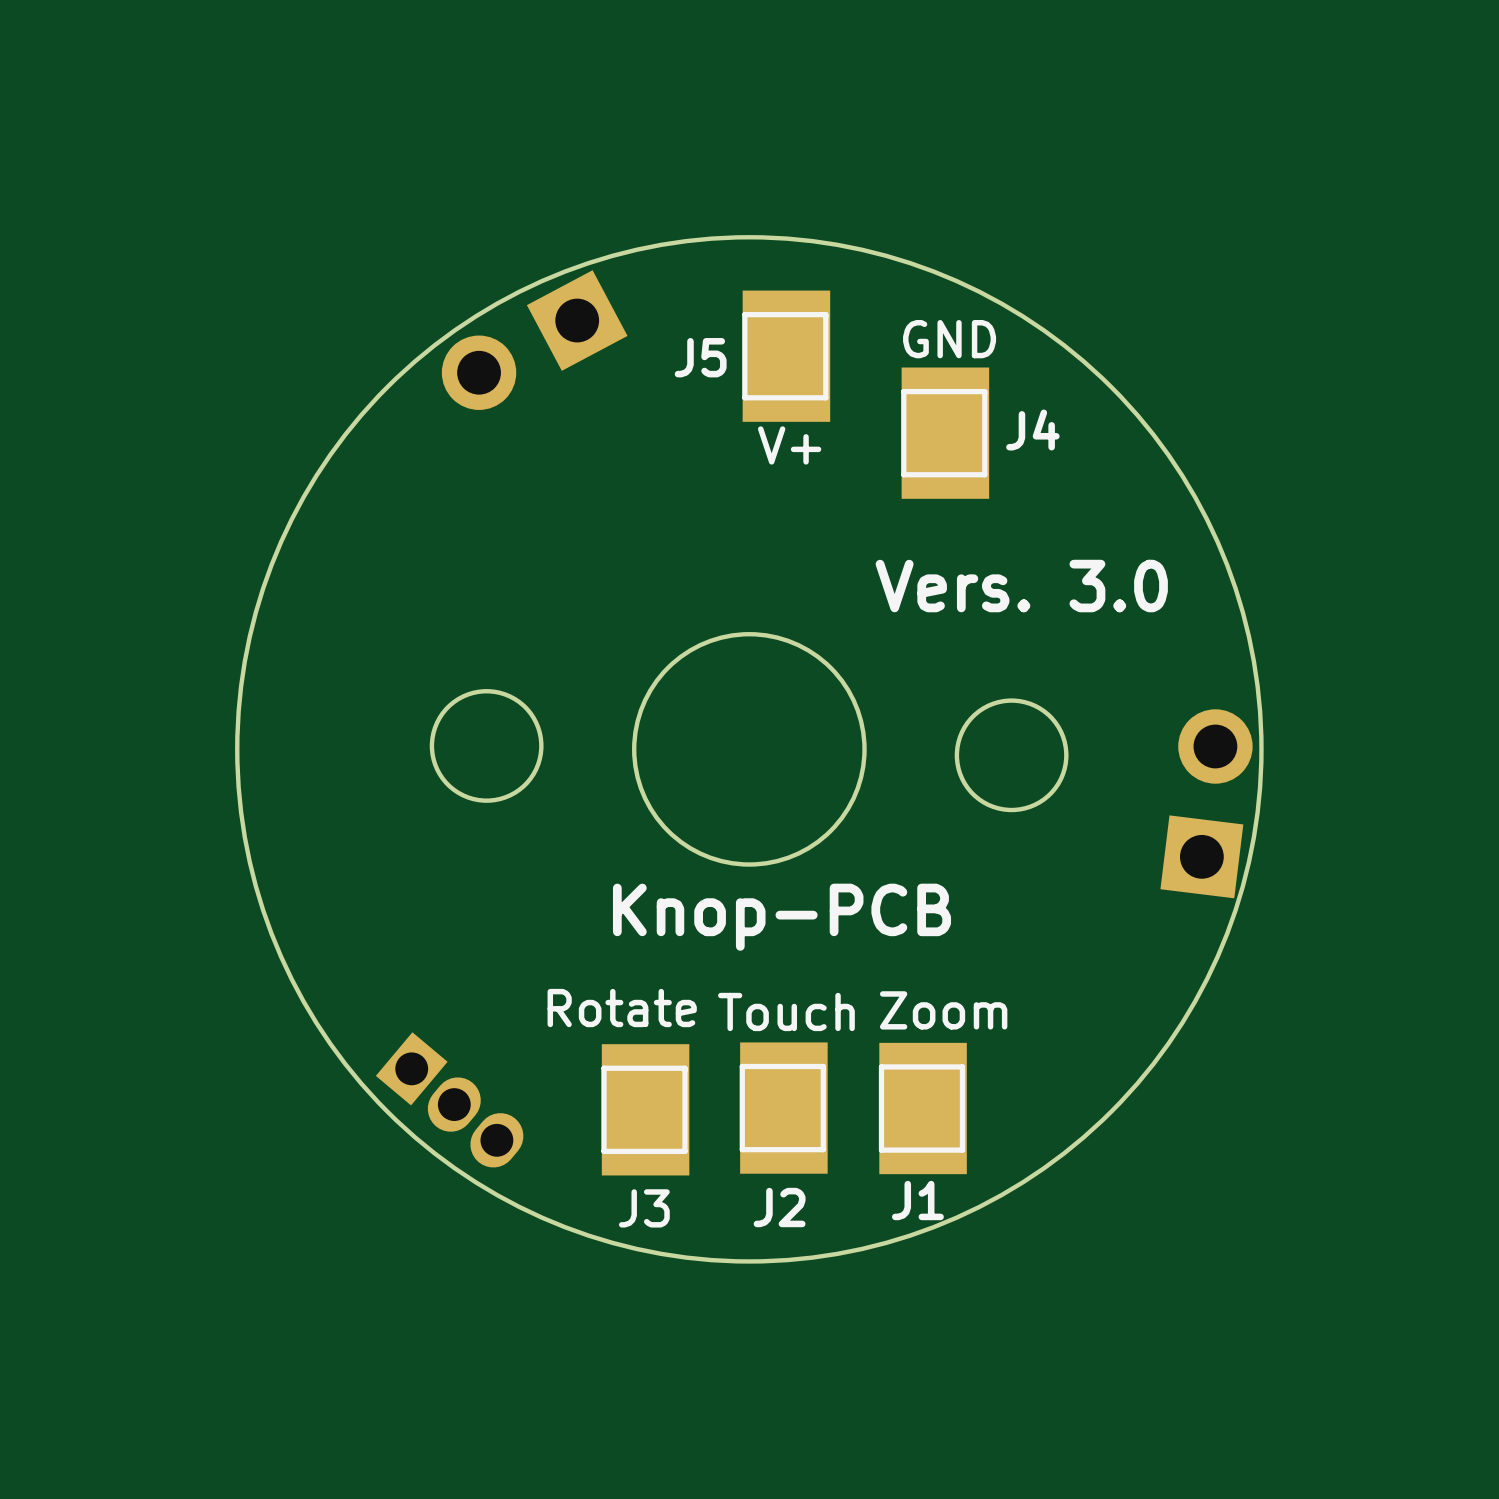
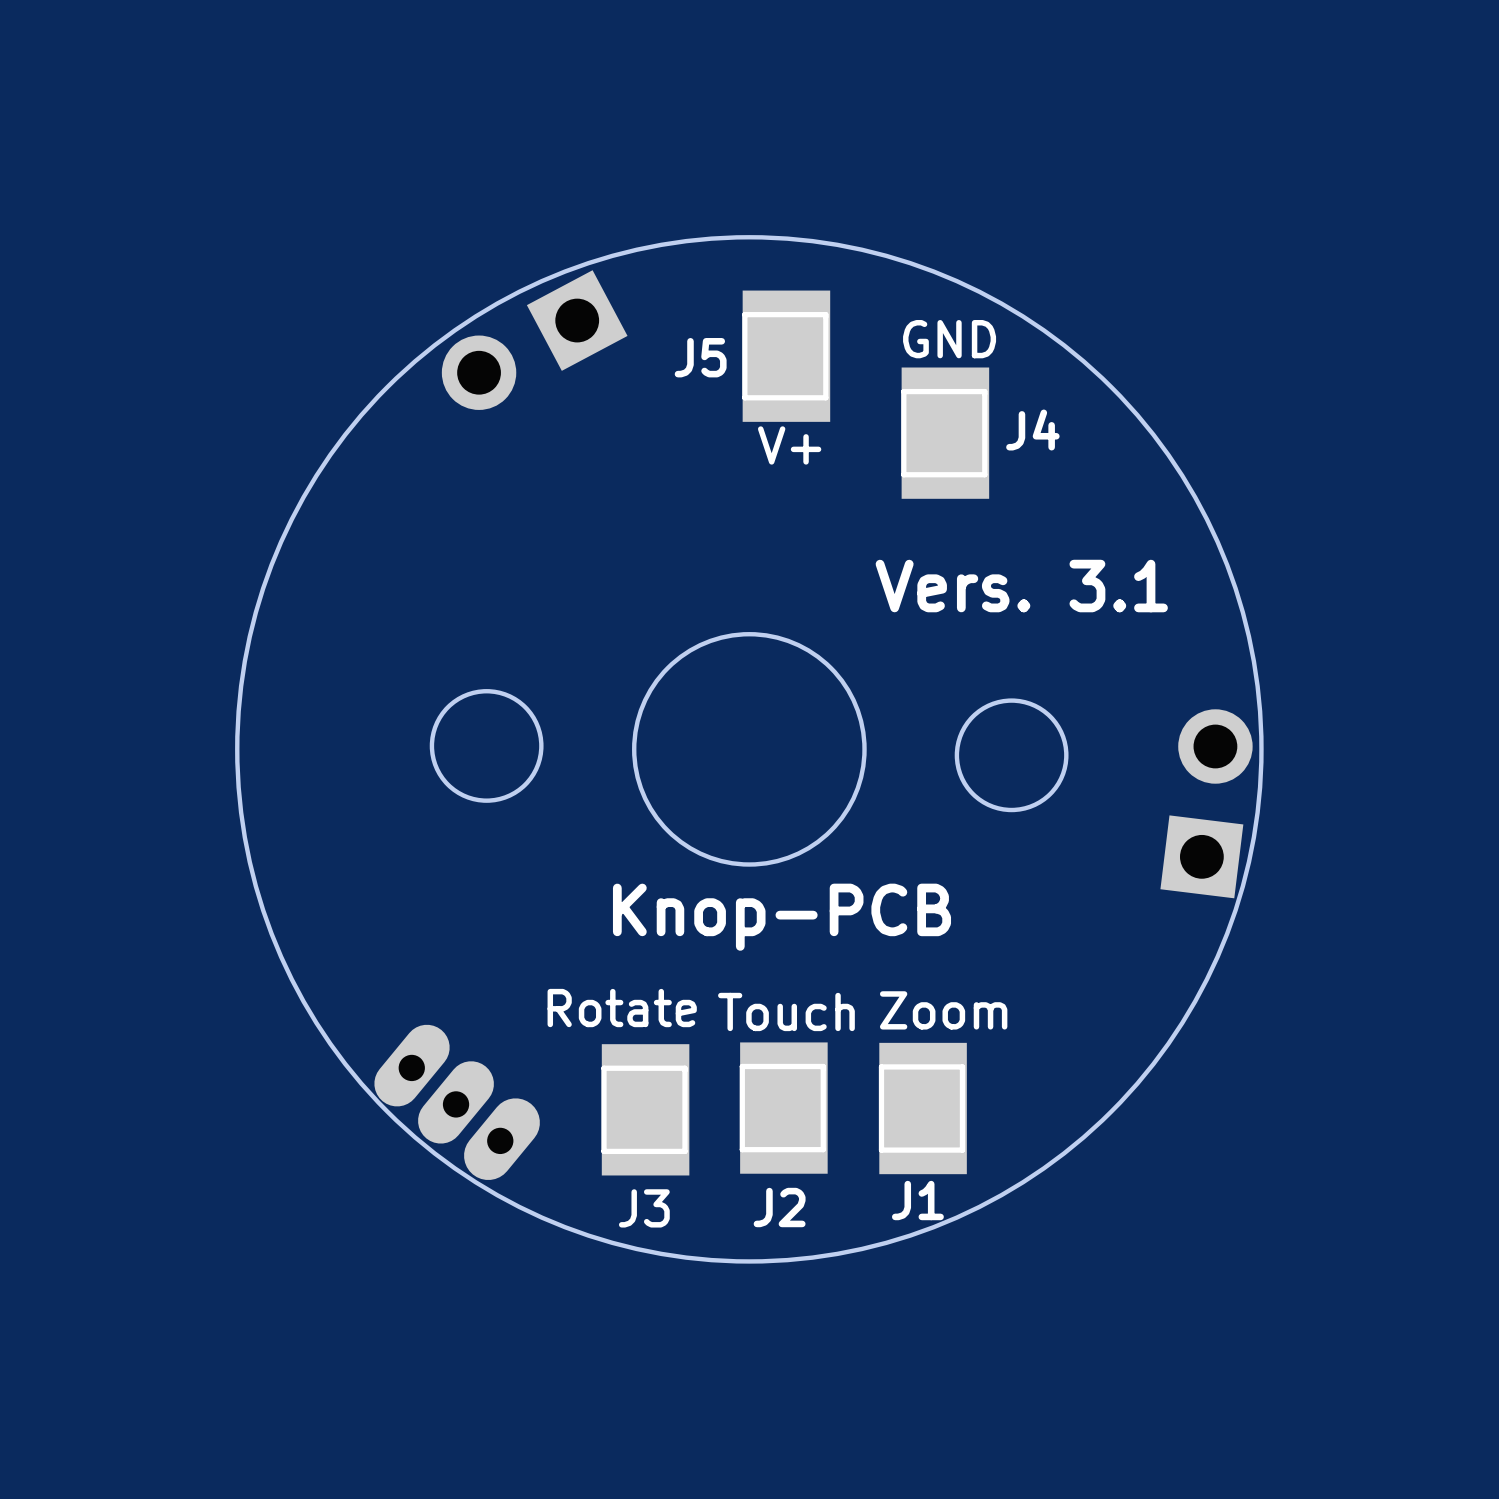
text: Vers. 3.0 (1021, 586) -> Vers. 3.1 (1021, 586)
part footprint: [375, 1032, 524, 1168] -> [374, 1024, 540, 1181]

